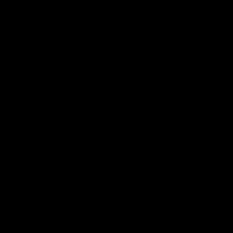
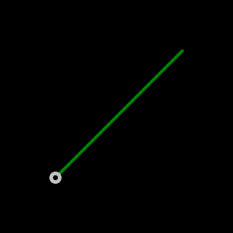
track: none -> (182, 50) (55, 177)
via: none -> (55, 177)

